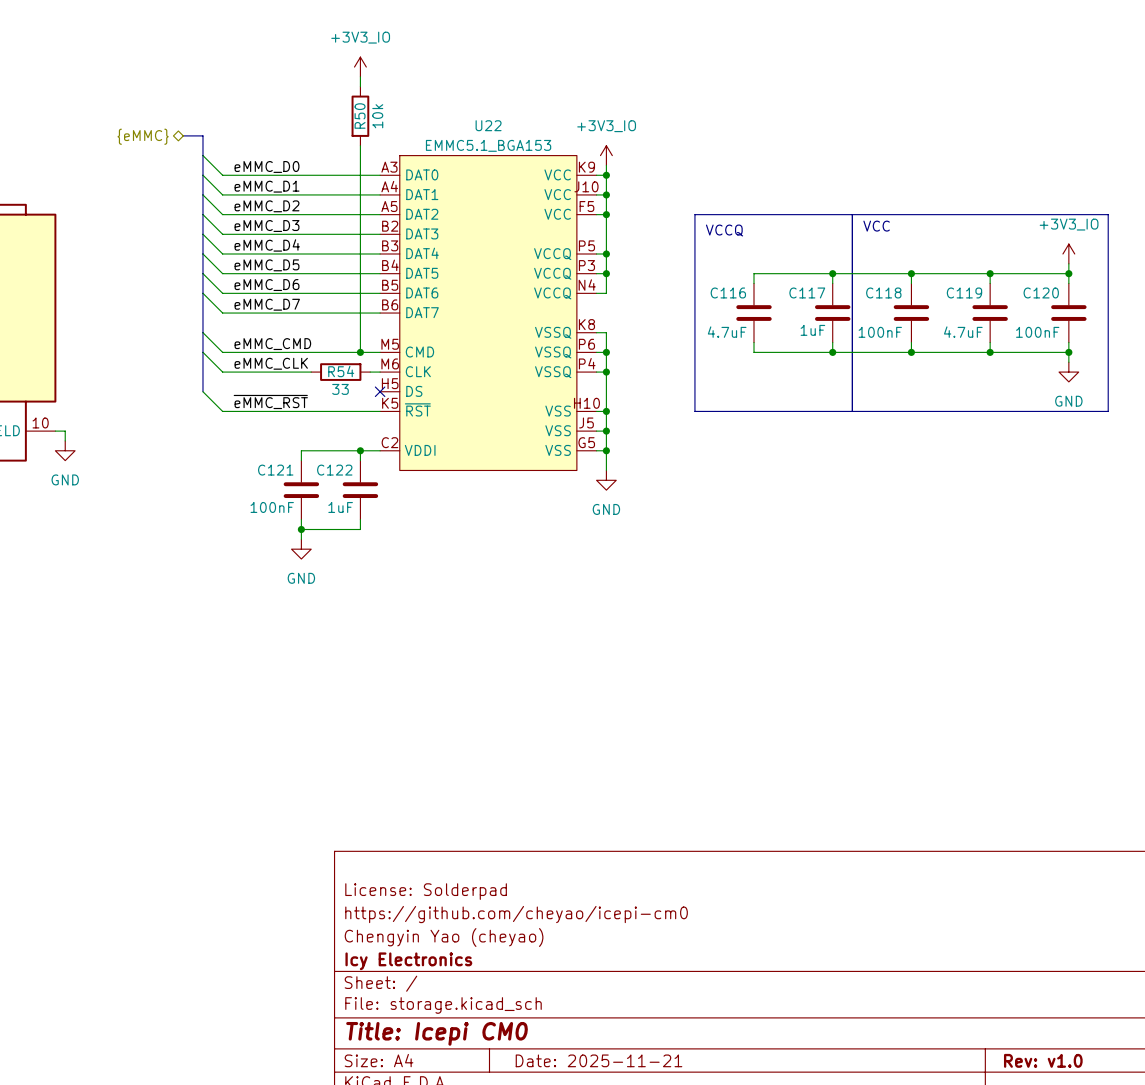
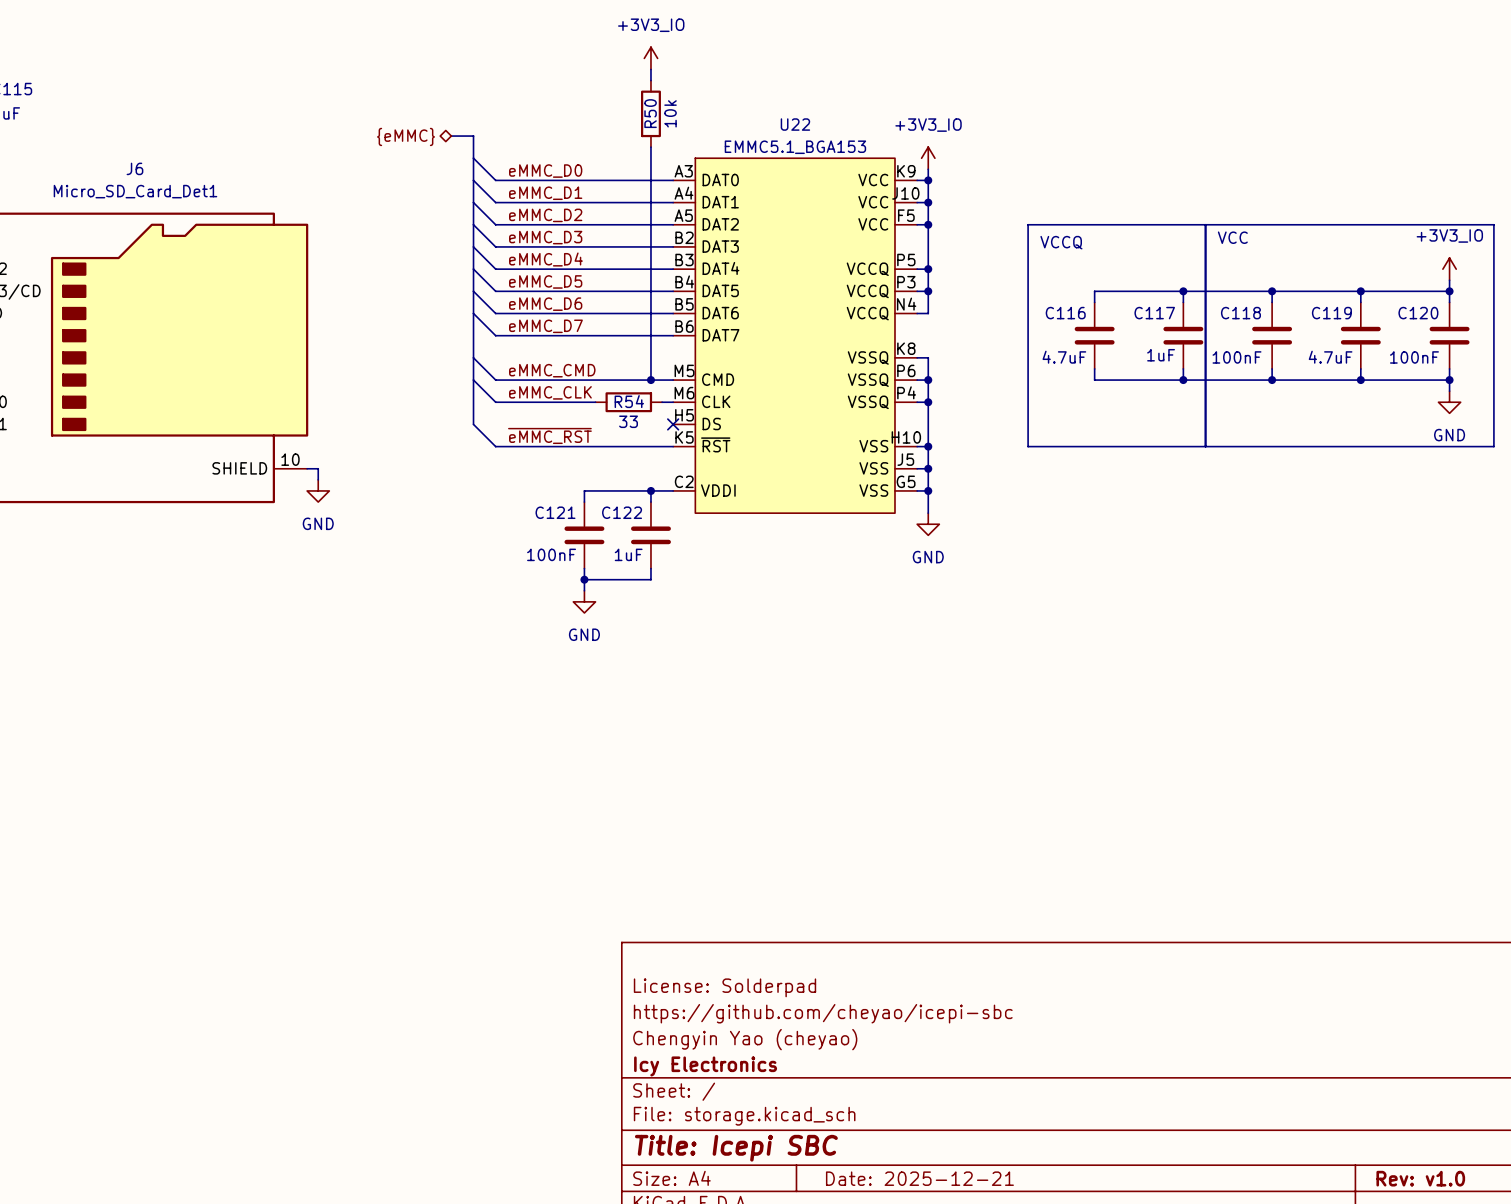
title block: https://github.com/cheyao/icepi-cm0 (516, 914) -> https://github.com/cheyao/icepi-sbc (823, 1013)
title block: Title: Icepi CM0 (437, 1033) -> Title: Icepi SBC (736, 1148)
title block: Date: 2025-11-21 (599, 1060) -> Date: 2025-12-21 (919, 1178)

